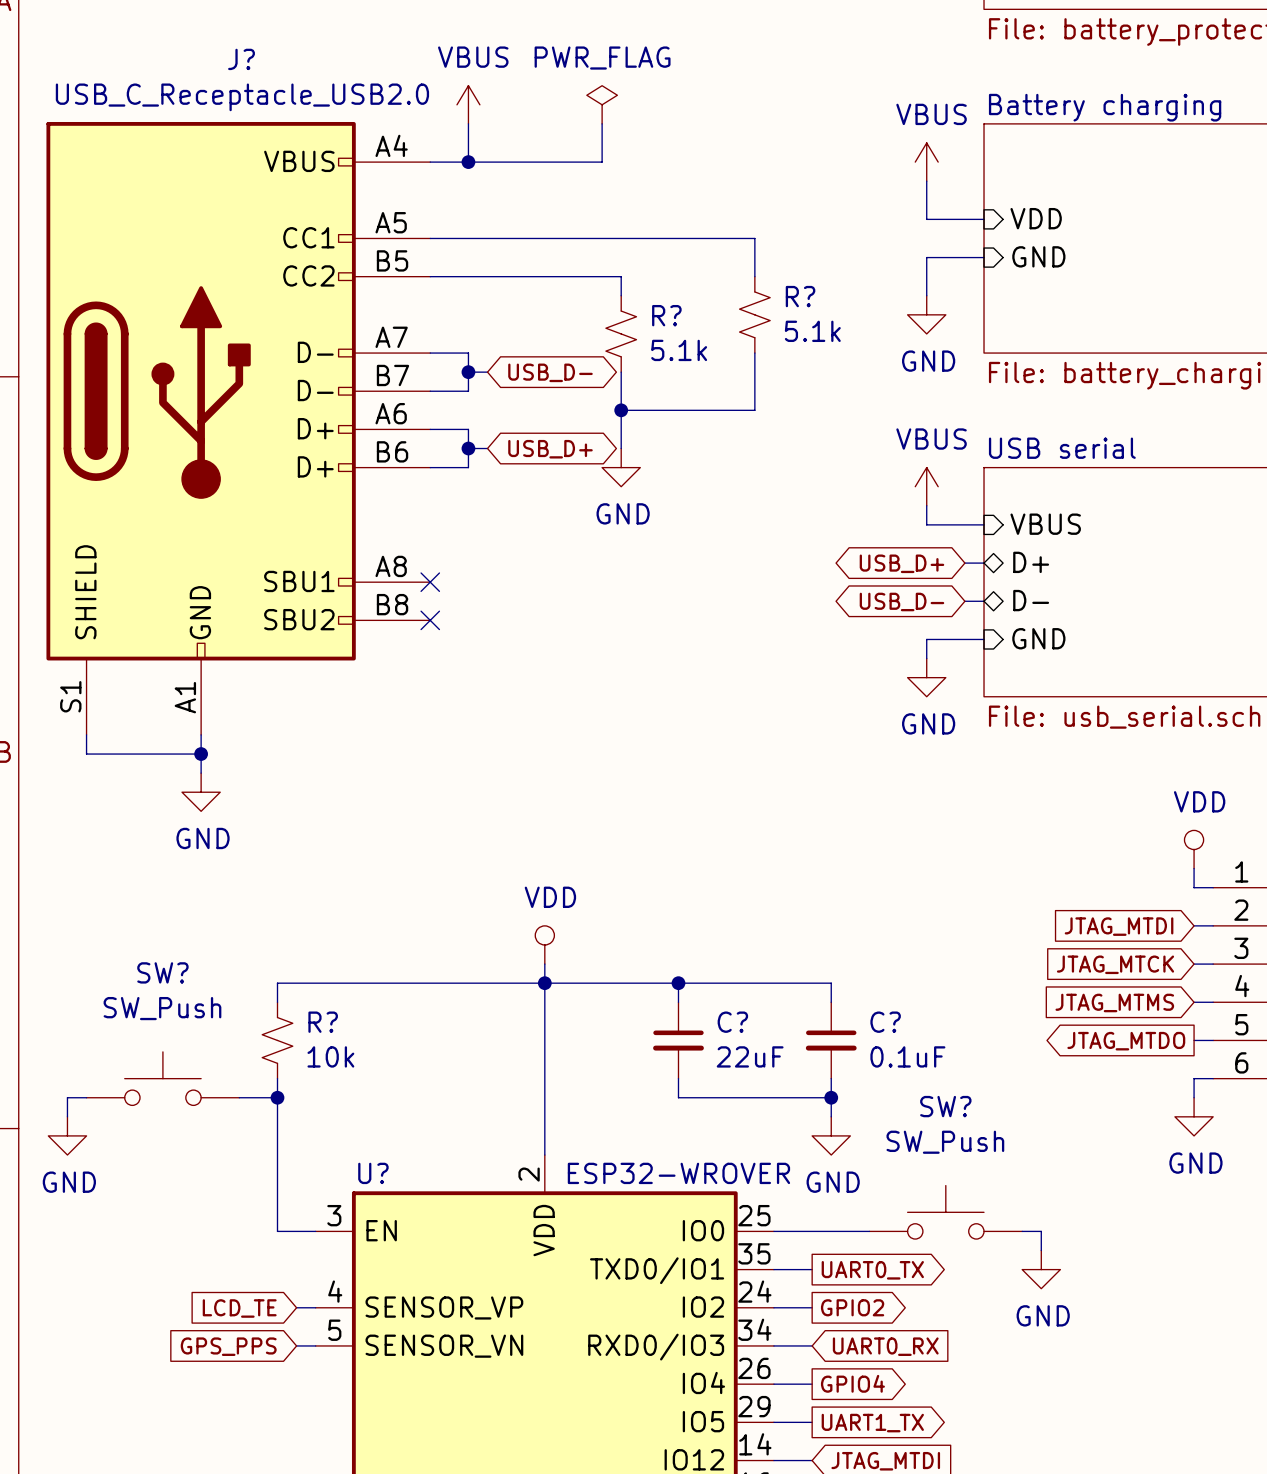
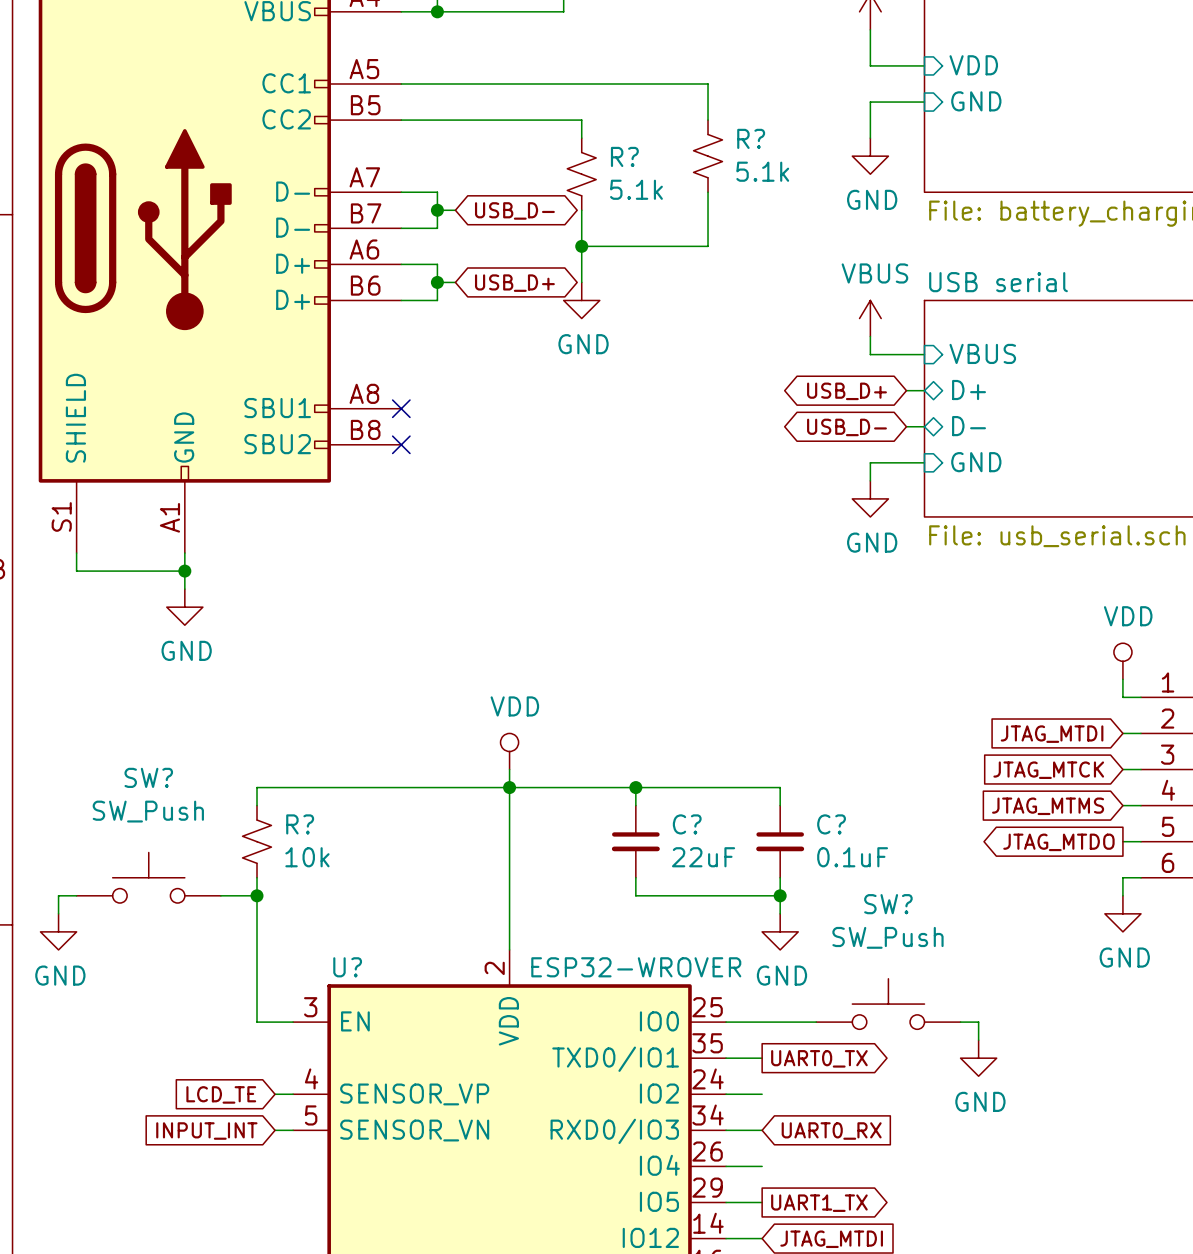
global label: GPIO2 (852, 1307) -> none
global label: GPS_PPS (228, 1346) -> INPUT_INT (206, 1131)
global label: GPIO4 (852, 1383) -> none

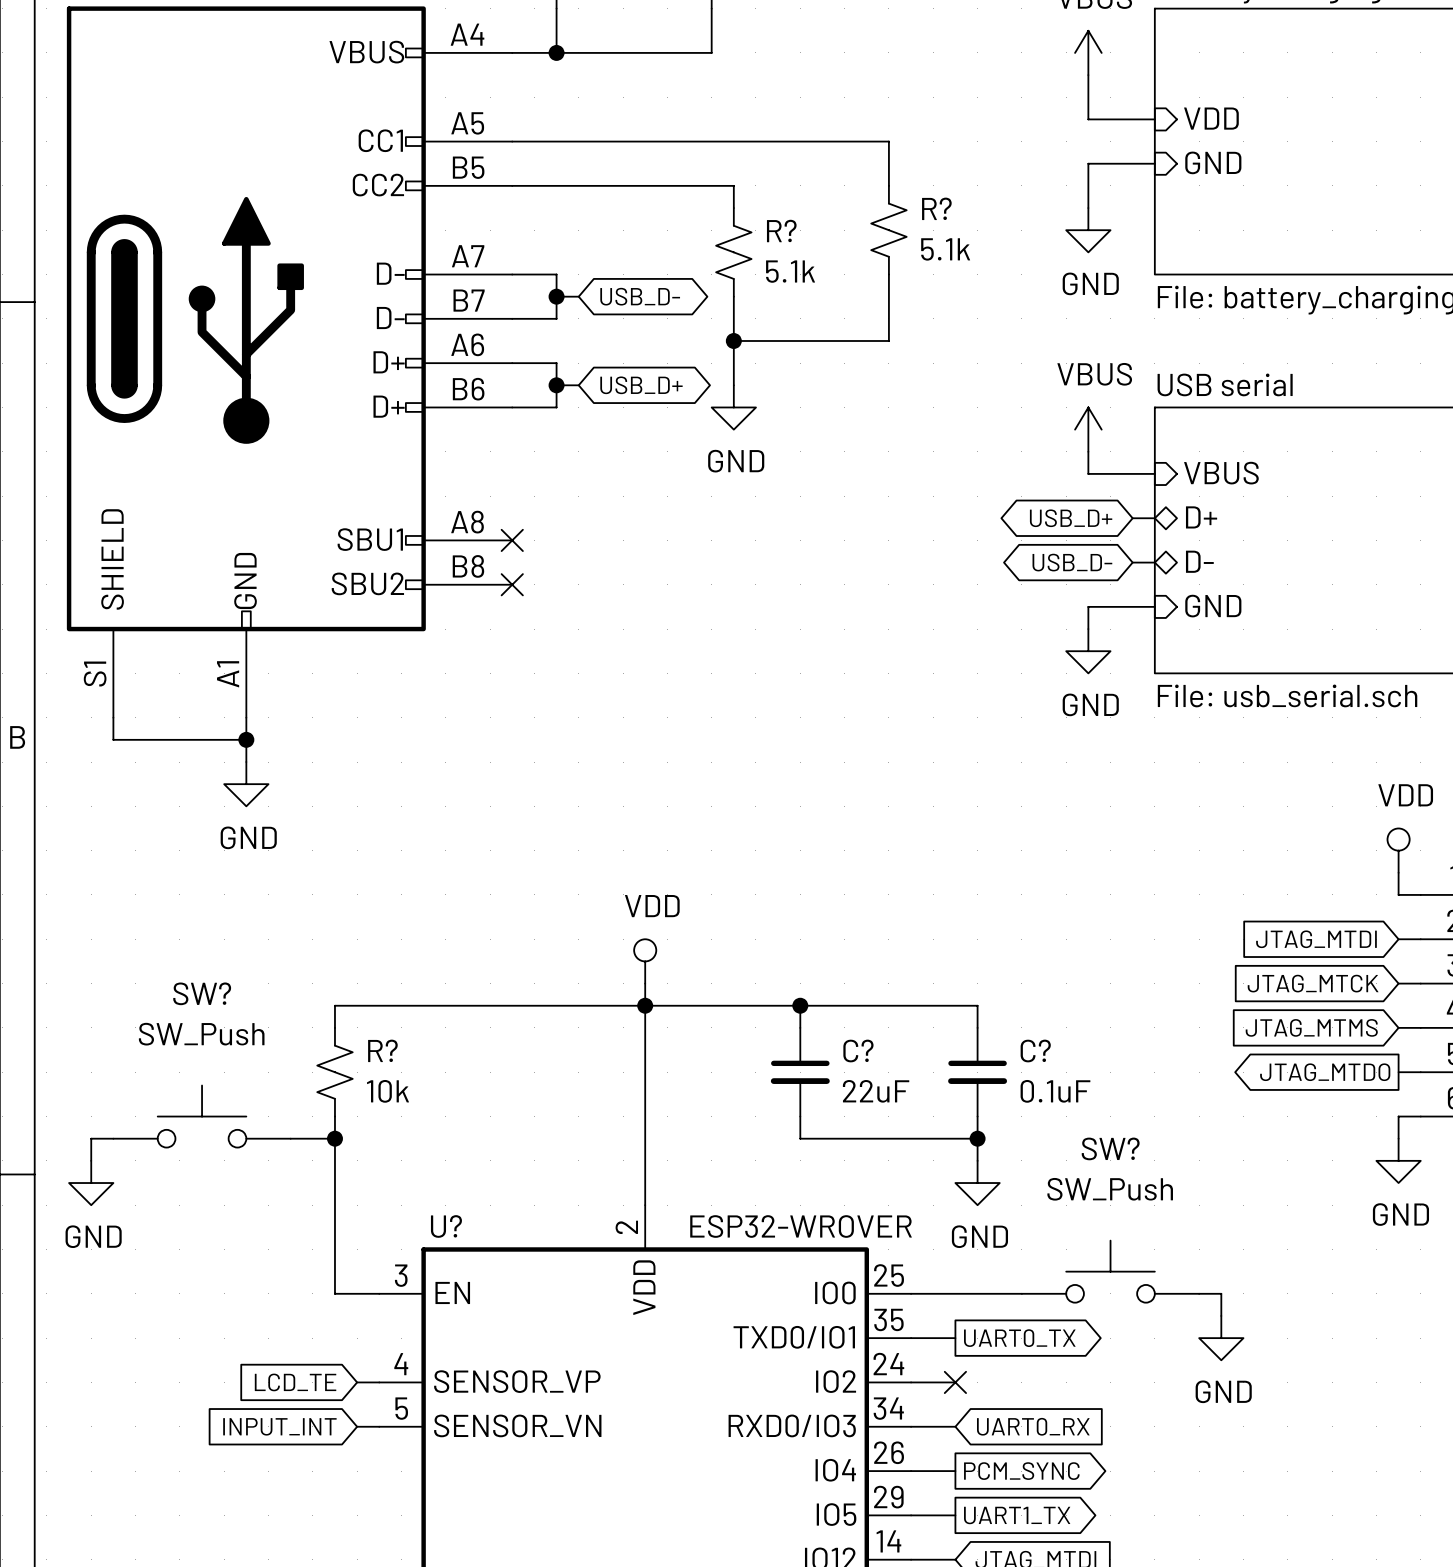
no-connect mark: none -> (955, 1382)
global label: none -> PCM_SYNC (1021, 1471)

